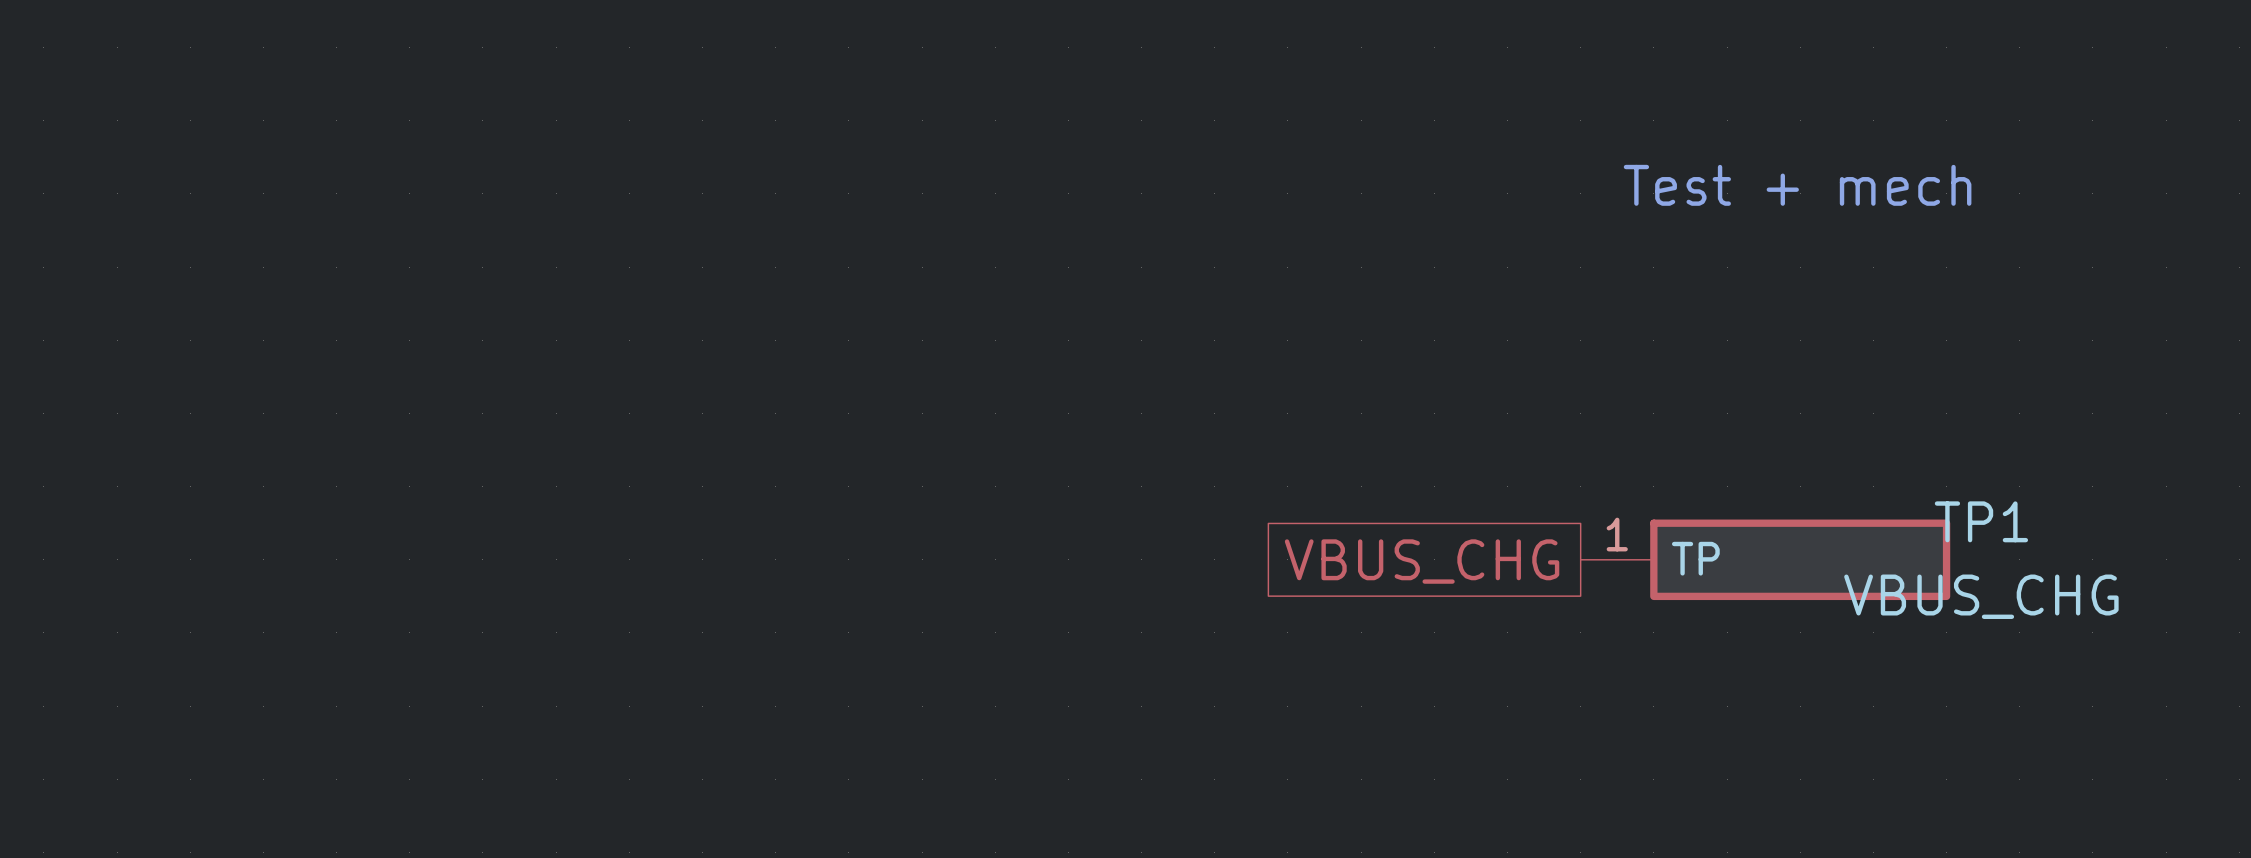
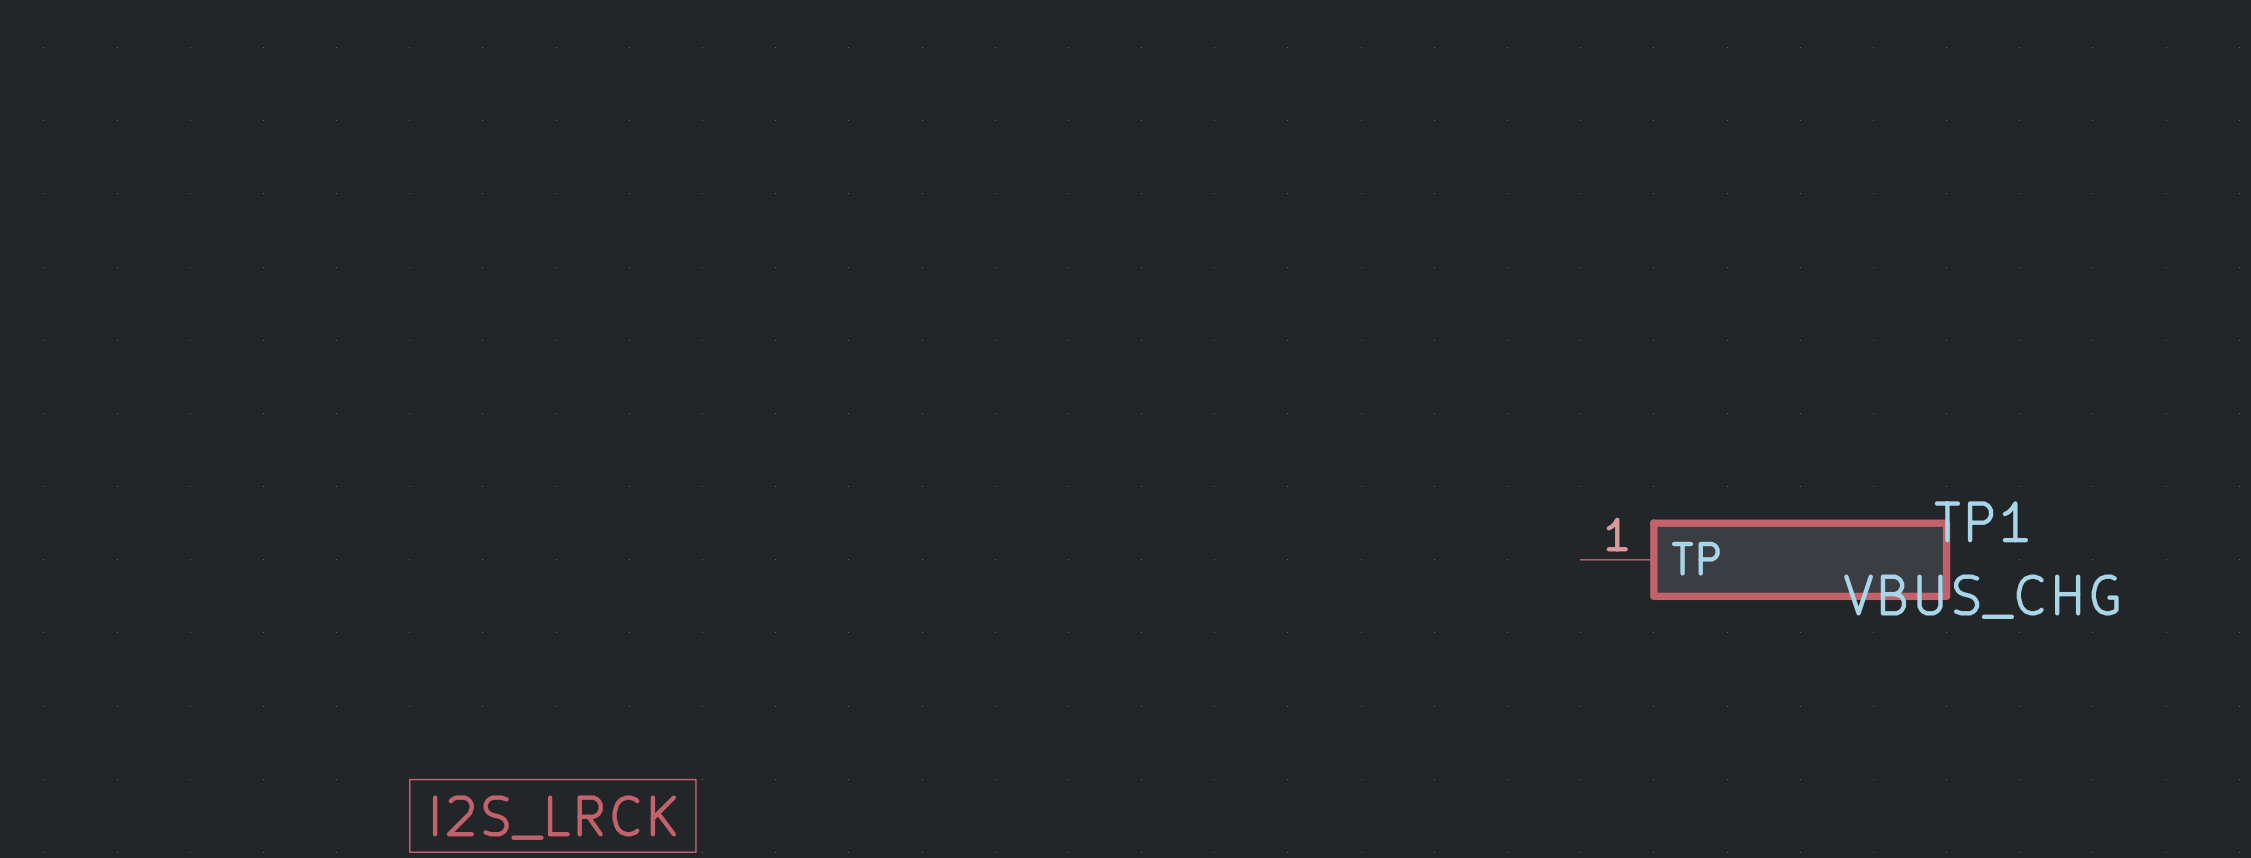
text: Test + mech (1797, 185) -> none
global label: VBUS_CHG (1422, 561) -> none
global label: none -> I2S_LRCK (554, 817)

